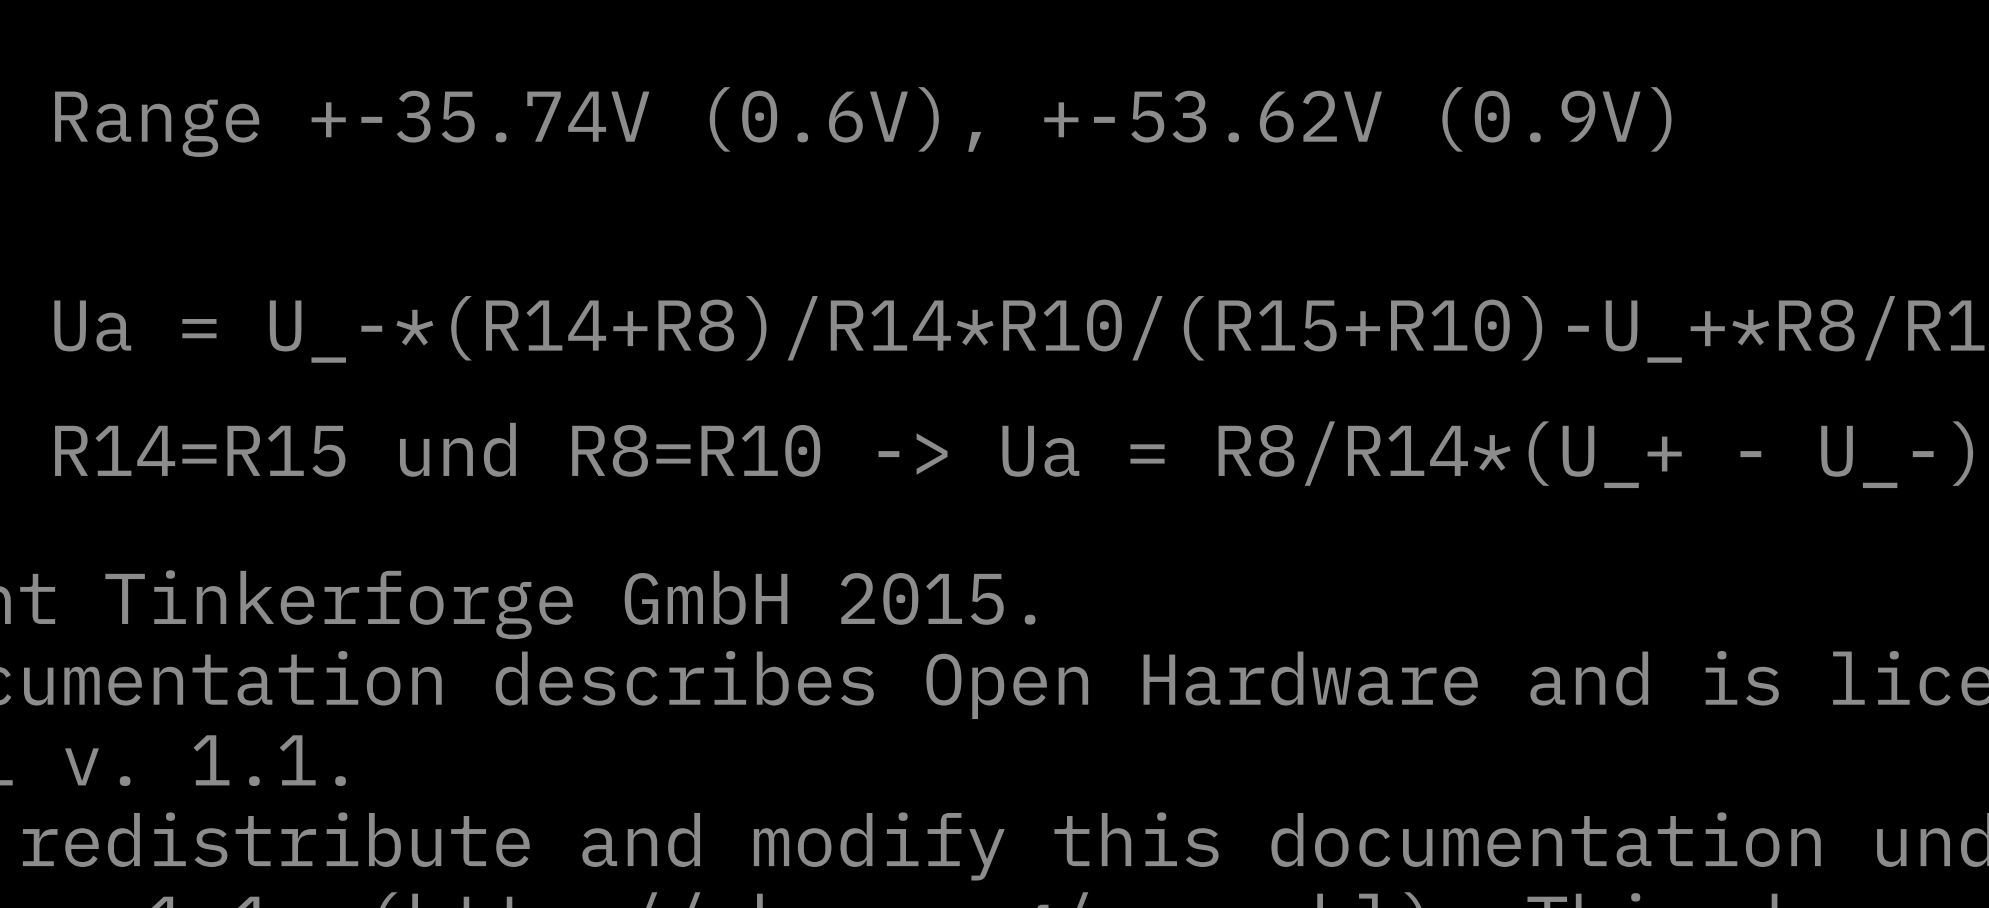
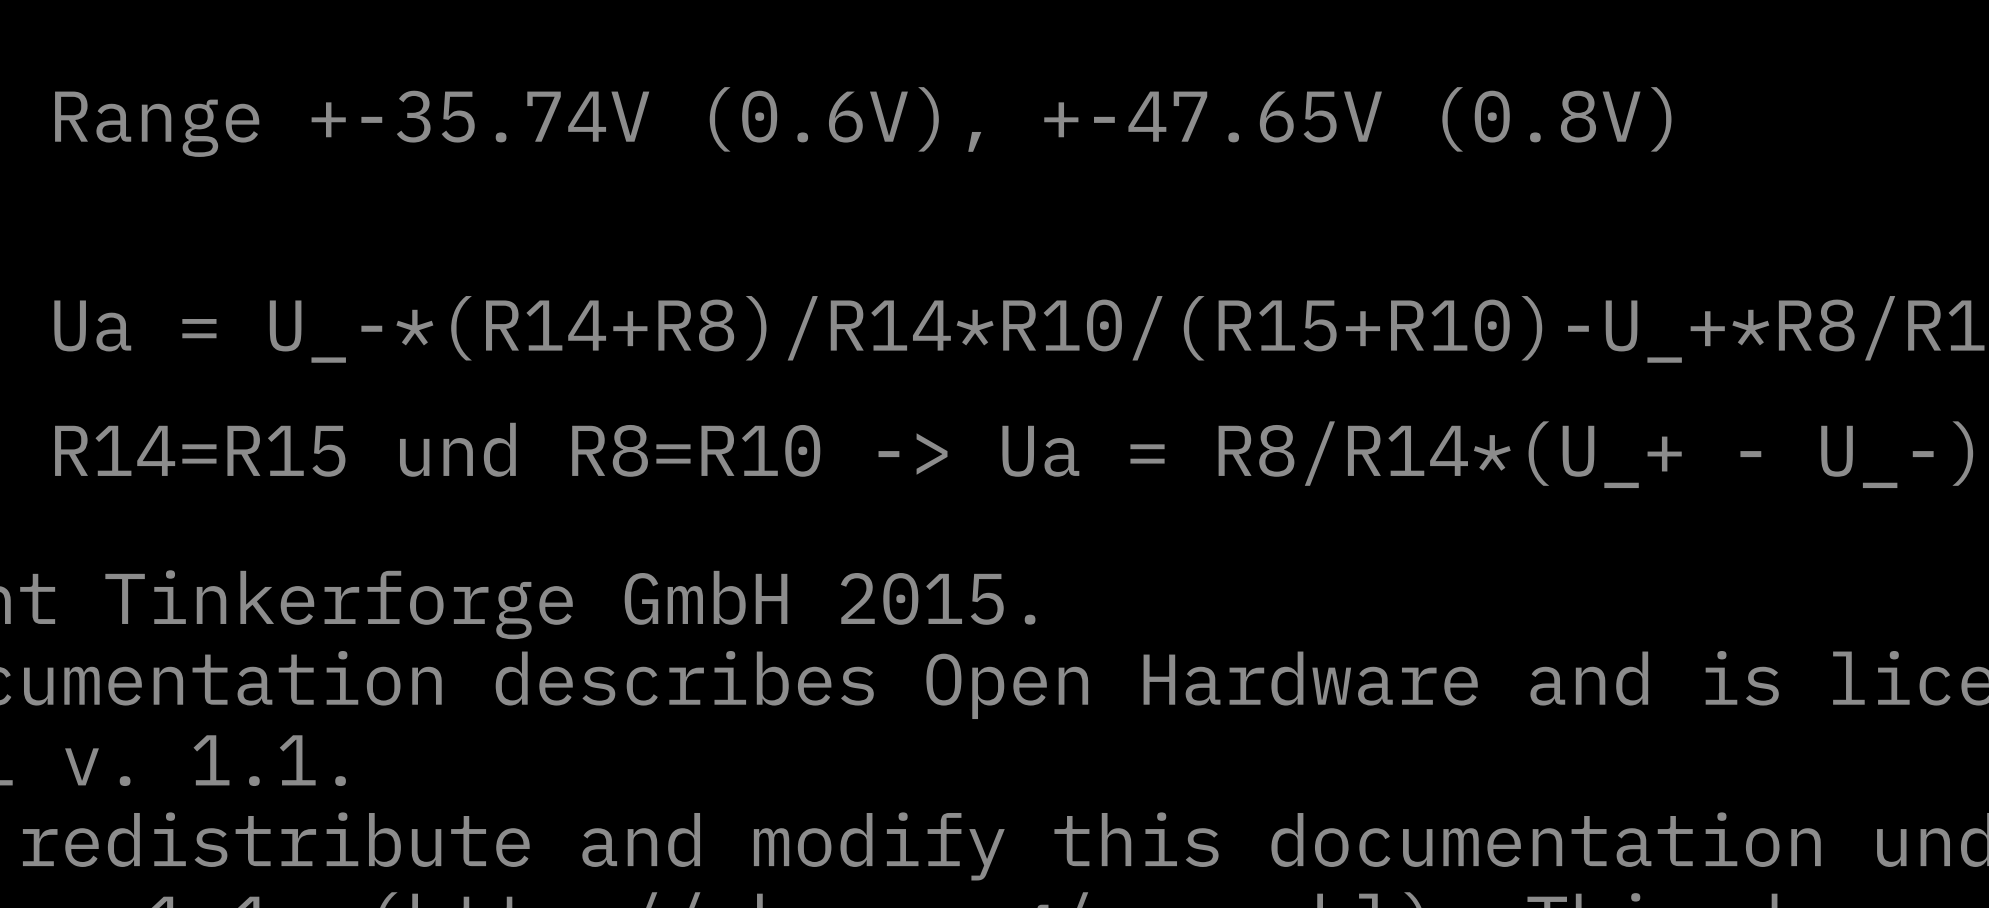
text: Range +-35.74V (0.6V), +-53.62V (0.9V) (863, 122) -> Range +-35.74V (0.6V), +-47.65V (0.8V) (863, 122)

